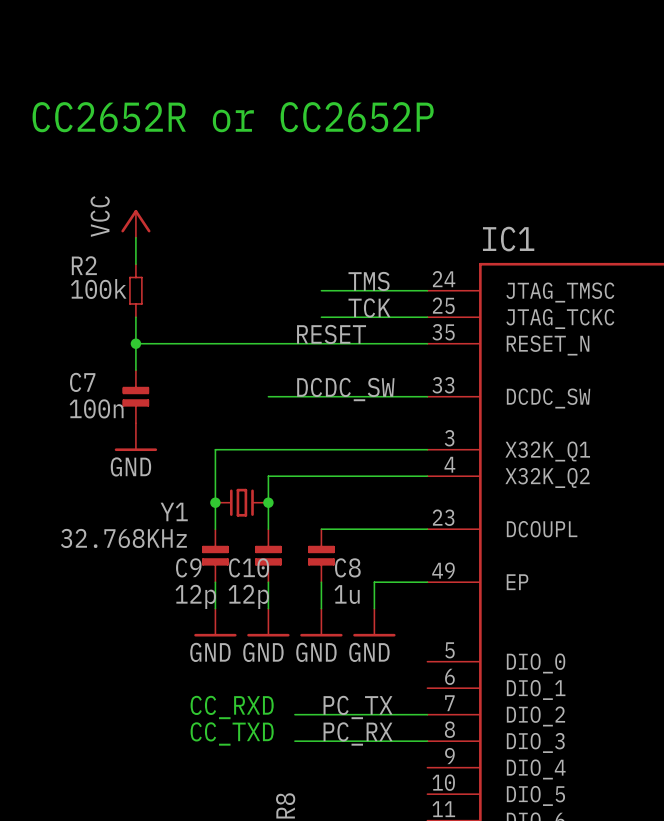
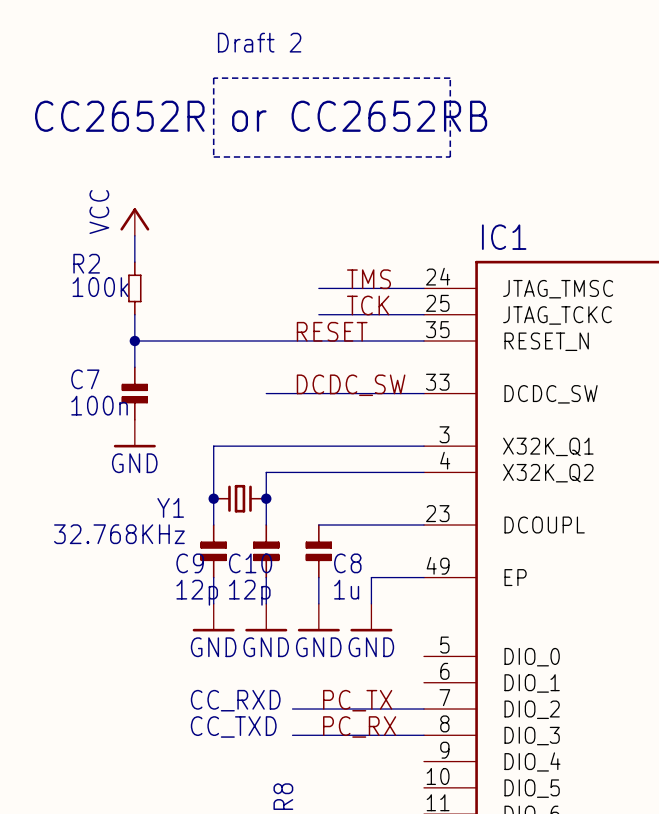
text: none -> Draft 2 (259, 42)
line: none -> (213, 78) (213, 156) (450, 156) (450, 78) (213, 78)
text: CC2652R or CC2652P (233, 117) -> CC2652R or CC2652RB (261, 116)

